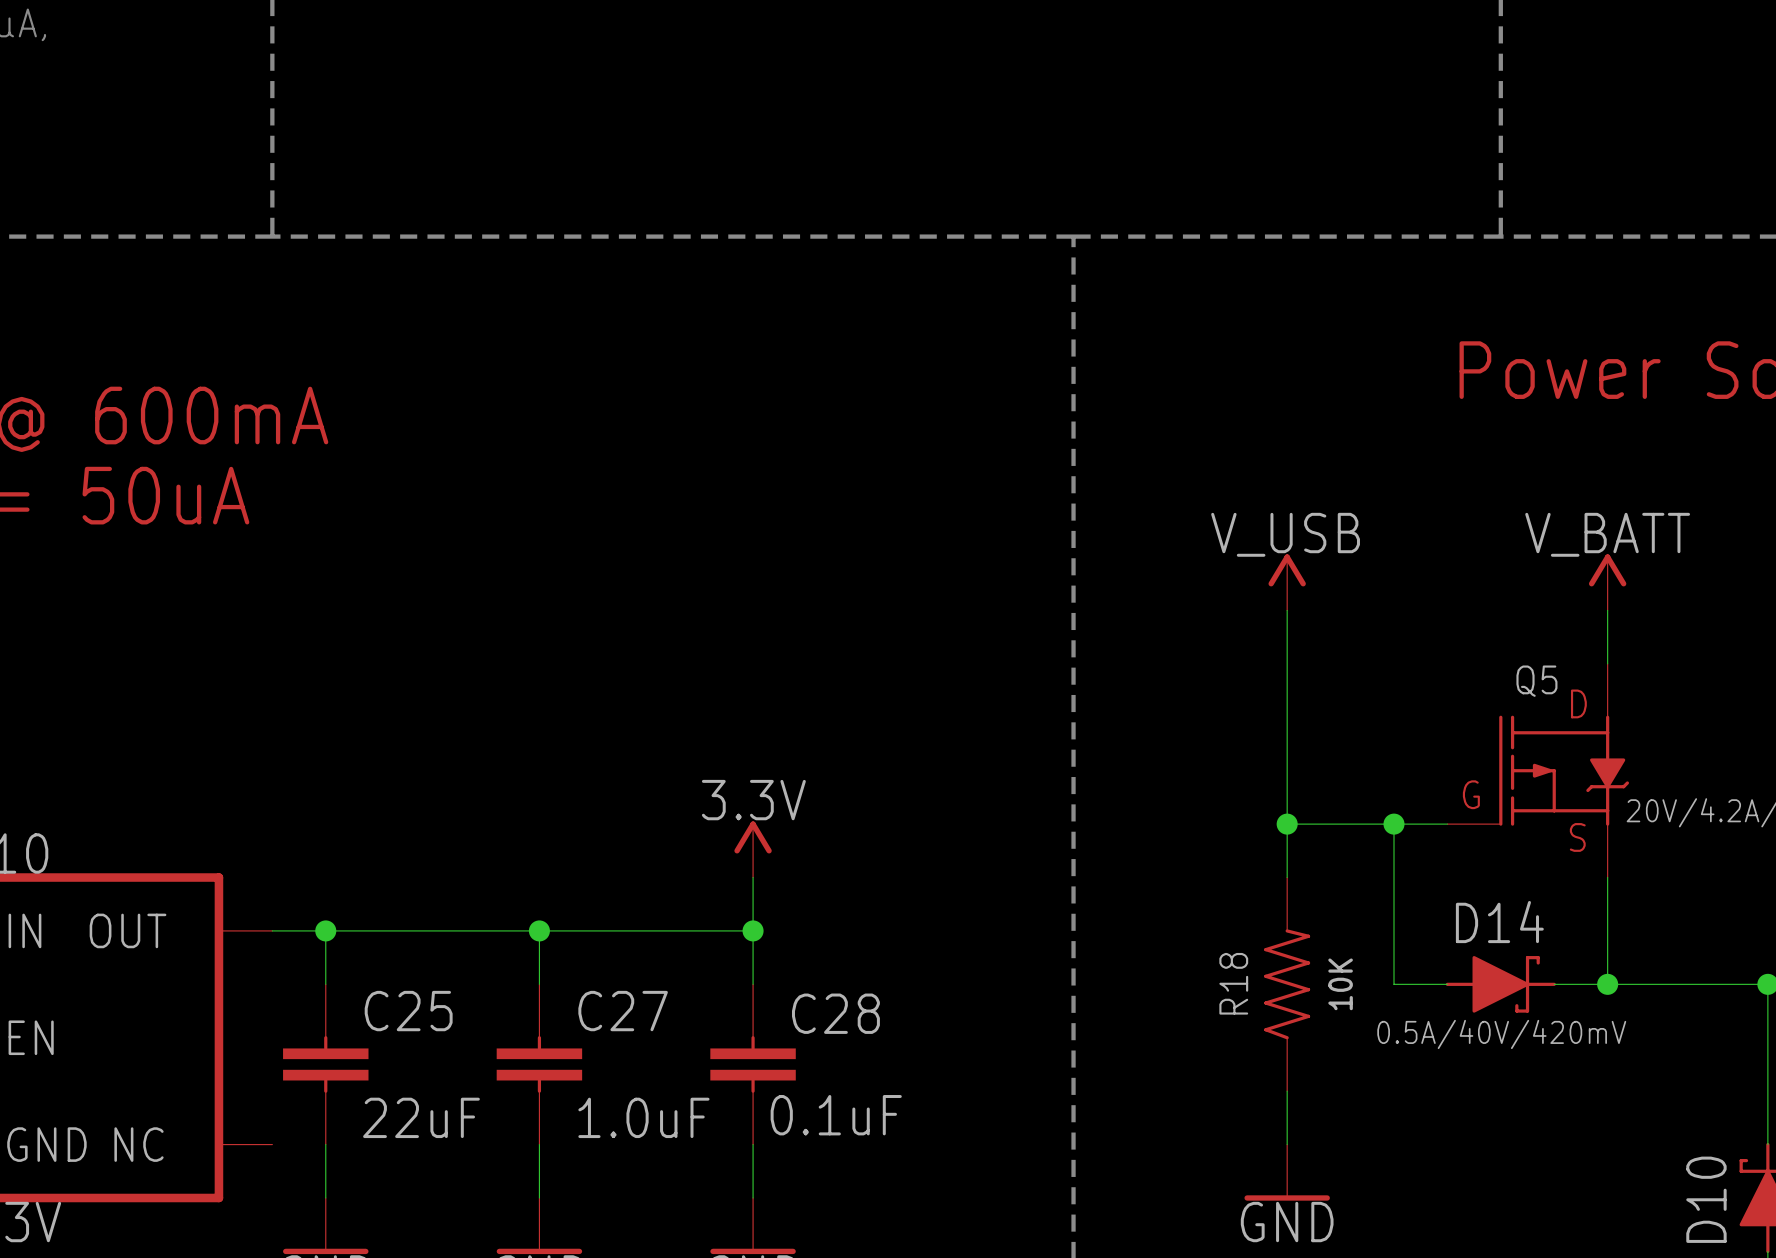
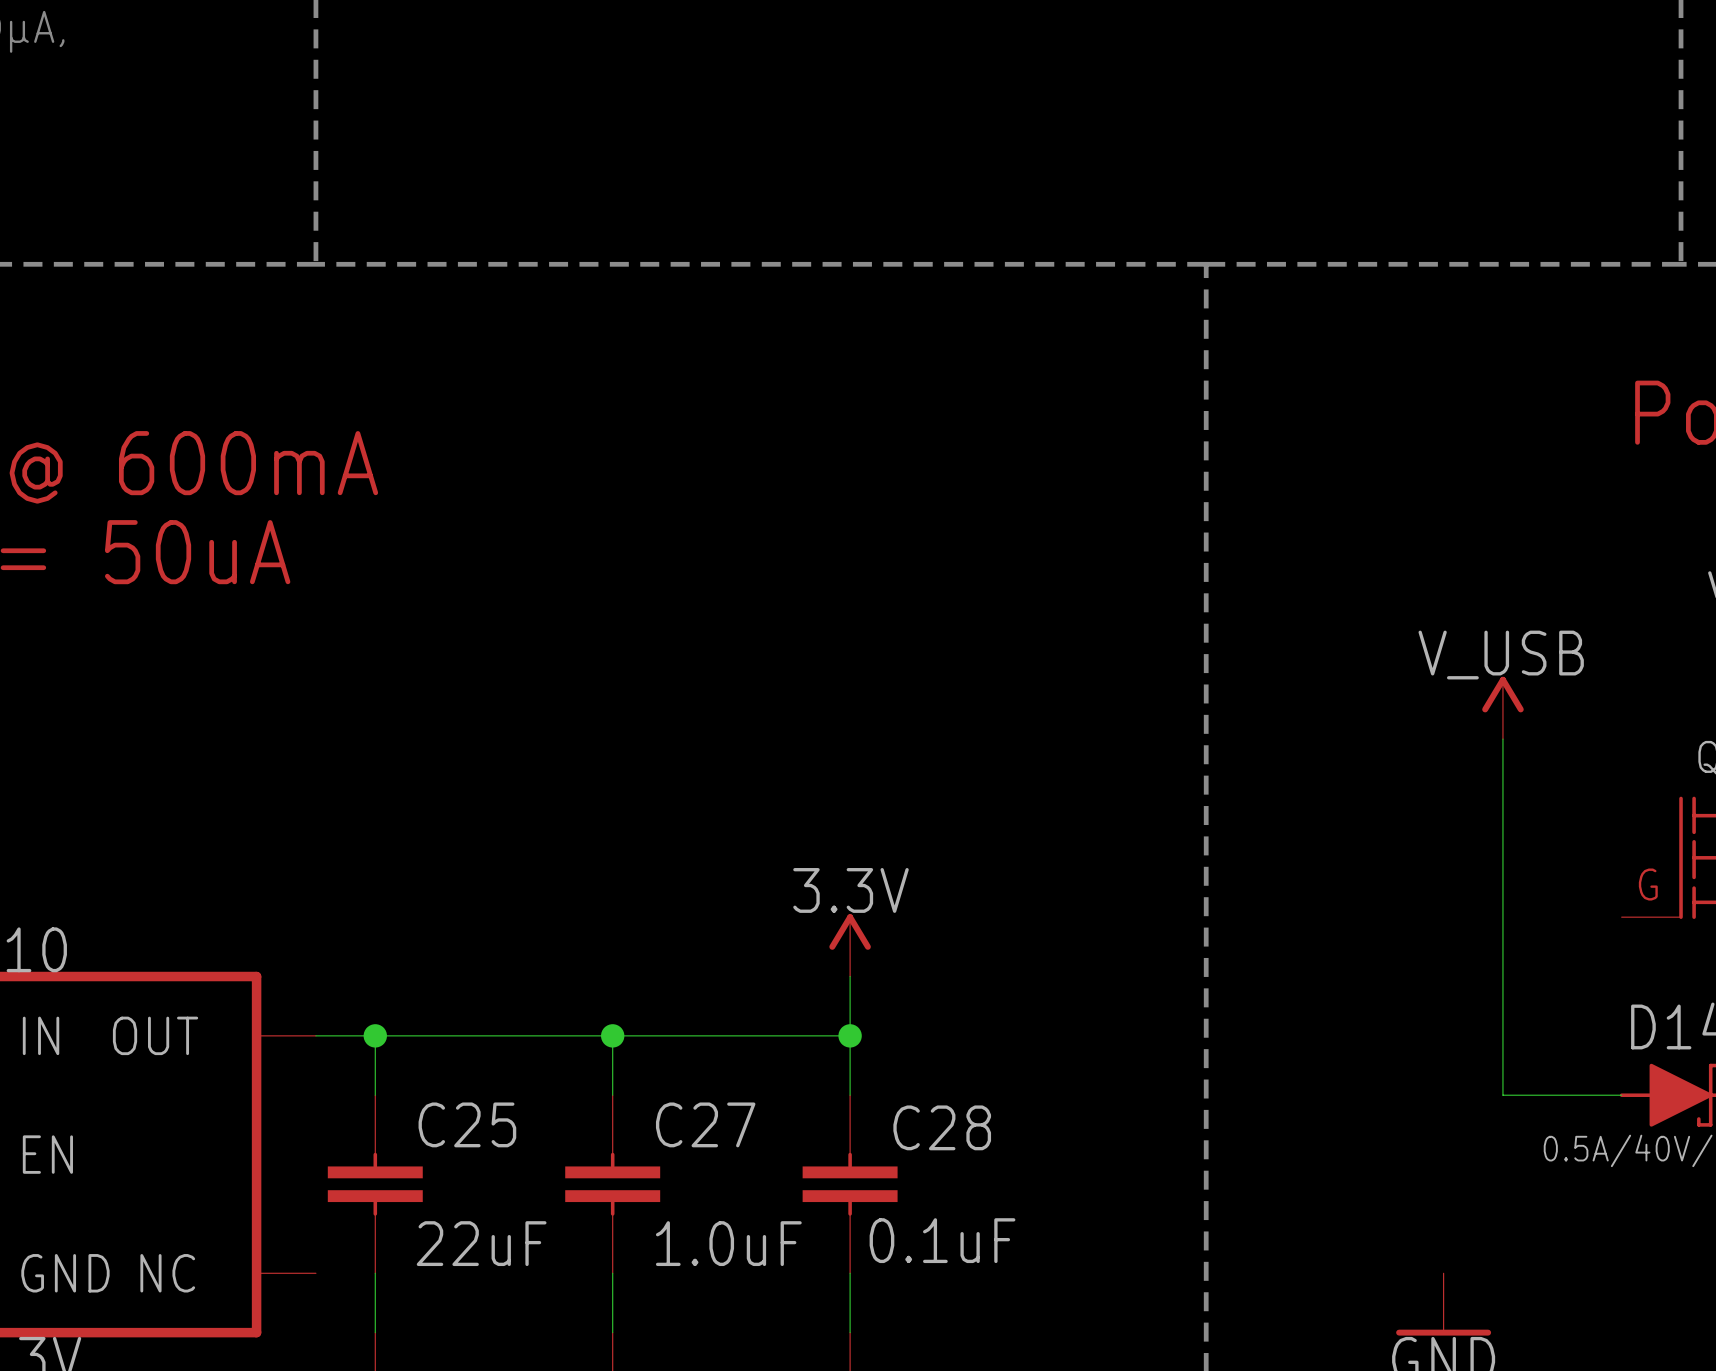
power symbol position: V_USB (1287, 582) -> V_USB (1502, 707)
wire: (1287, 610) (1287, 877) -> none
wire: (1287, 824) (1447, 824) -> none
junction: (1287, 824) -> none
wire: (1394, 824) (1394, 984) -> (1502, 739) (1502, 1095) (1562, 1095)
junction: (1394, 824) -> none
R18: 10K (1287, 984) -> none
wire: (1287, 1091) (1287, 1144) -> none

